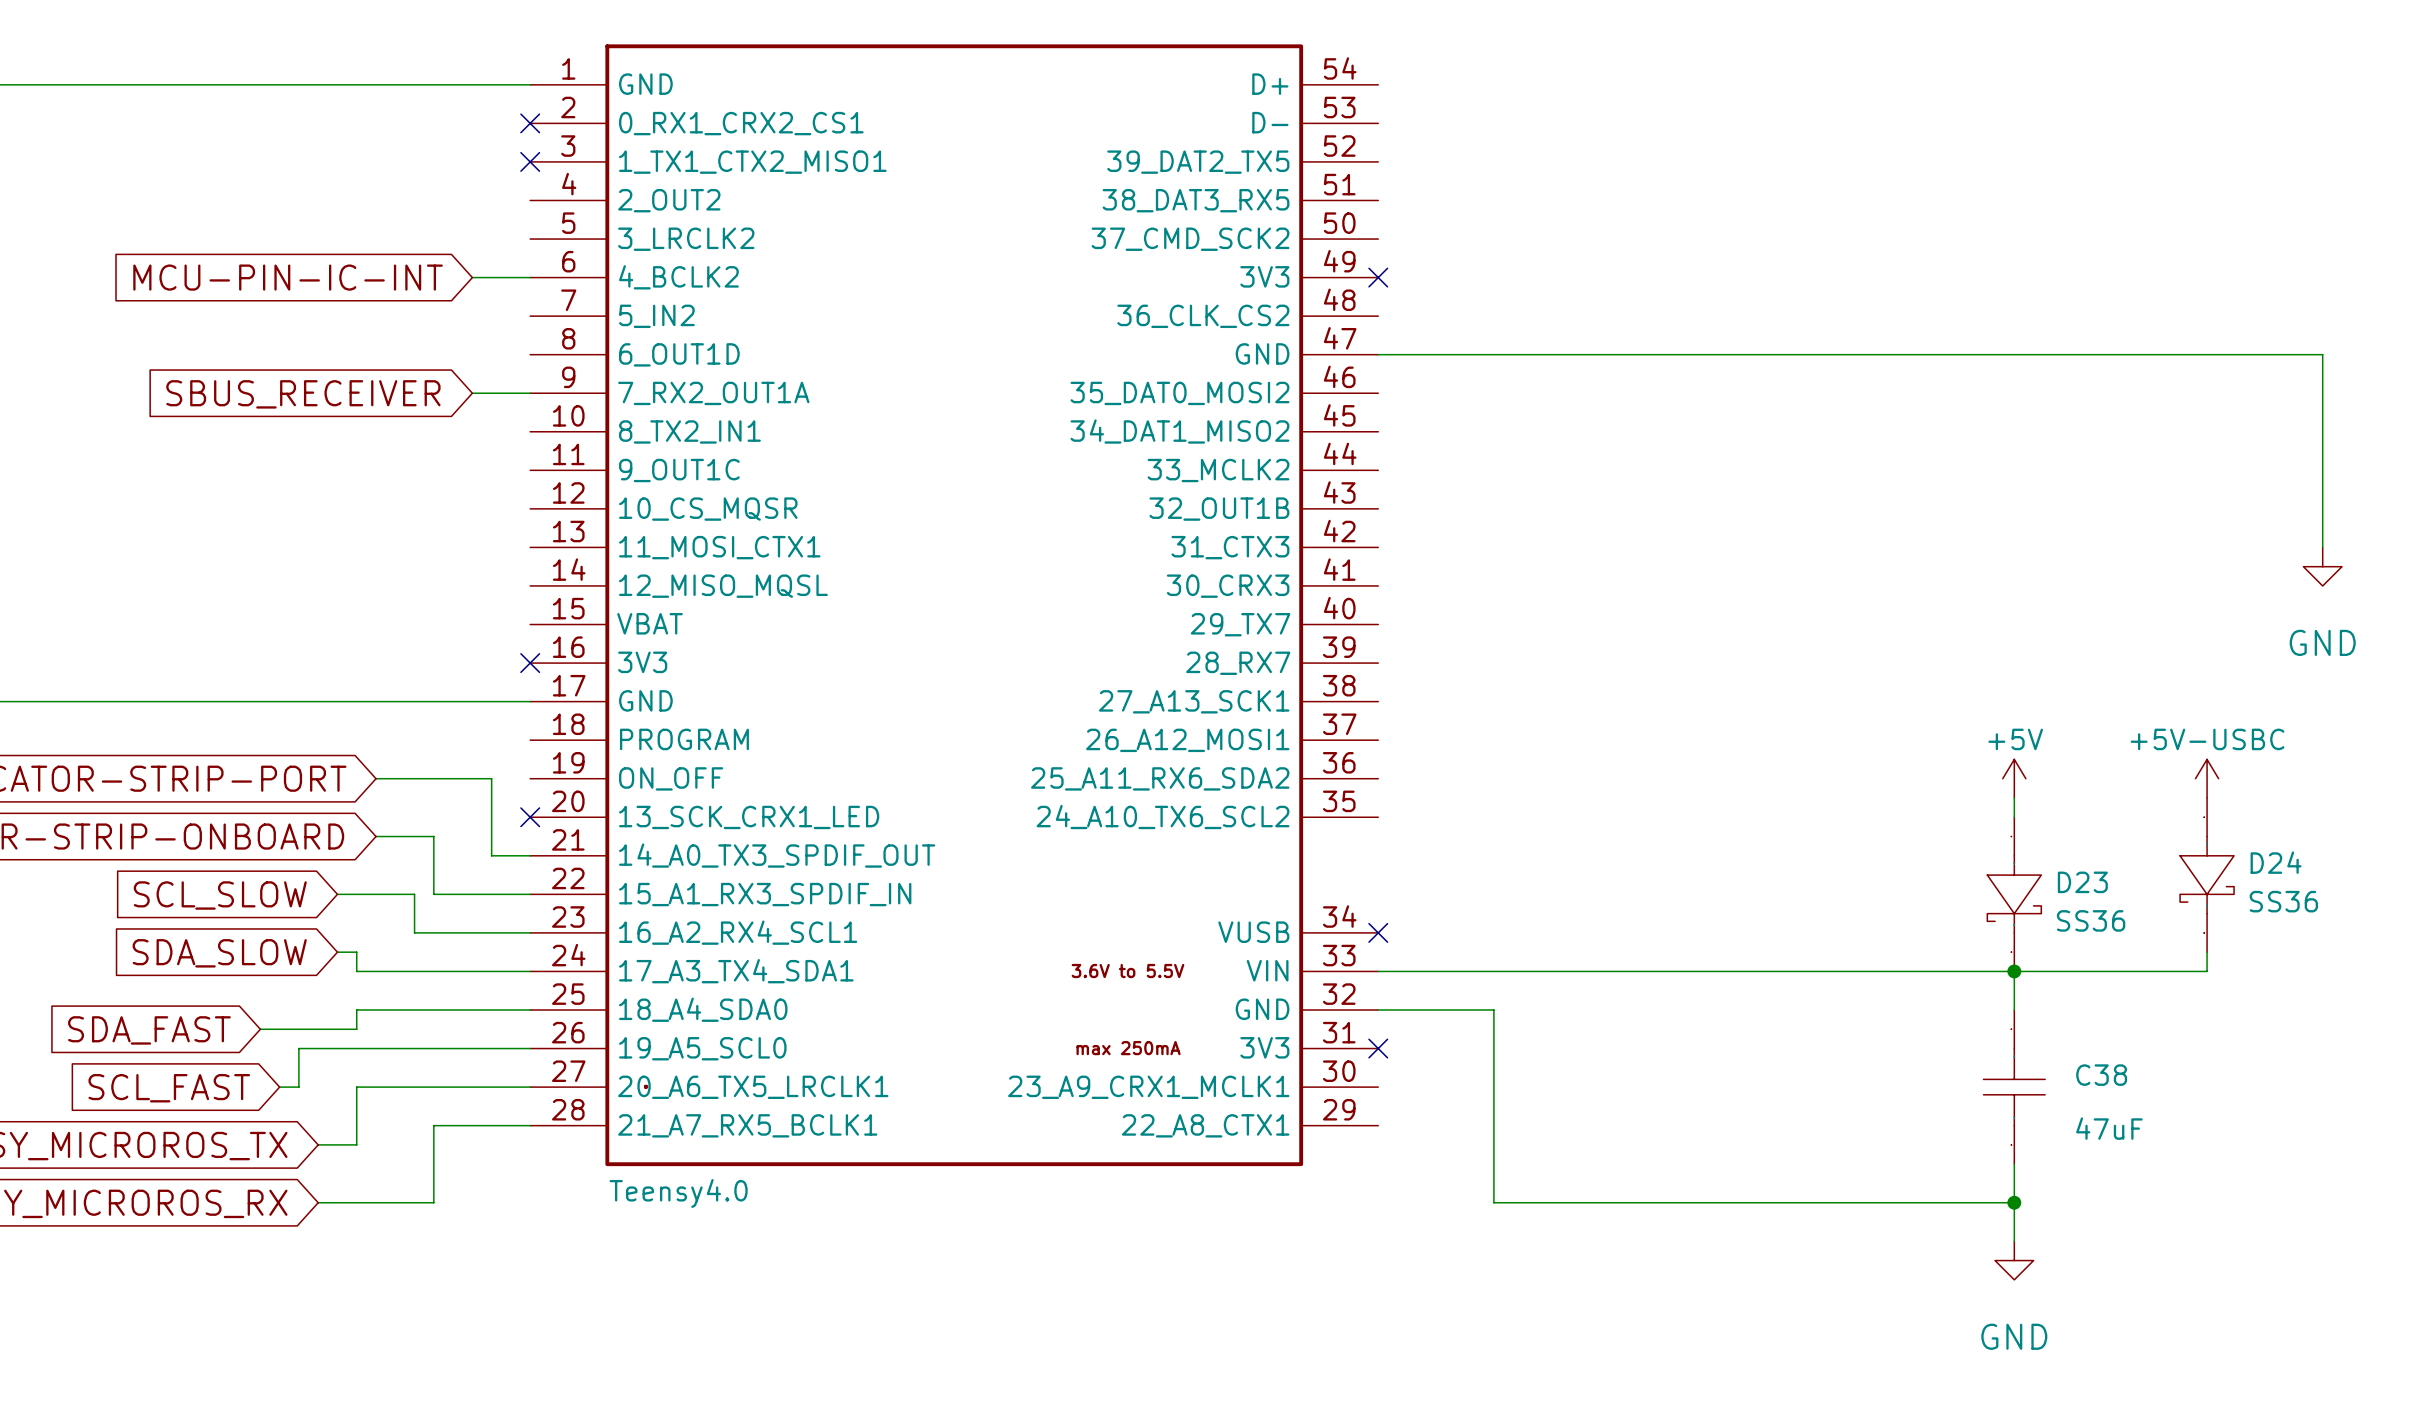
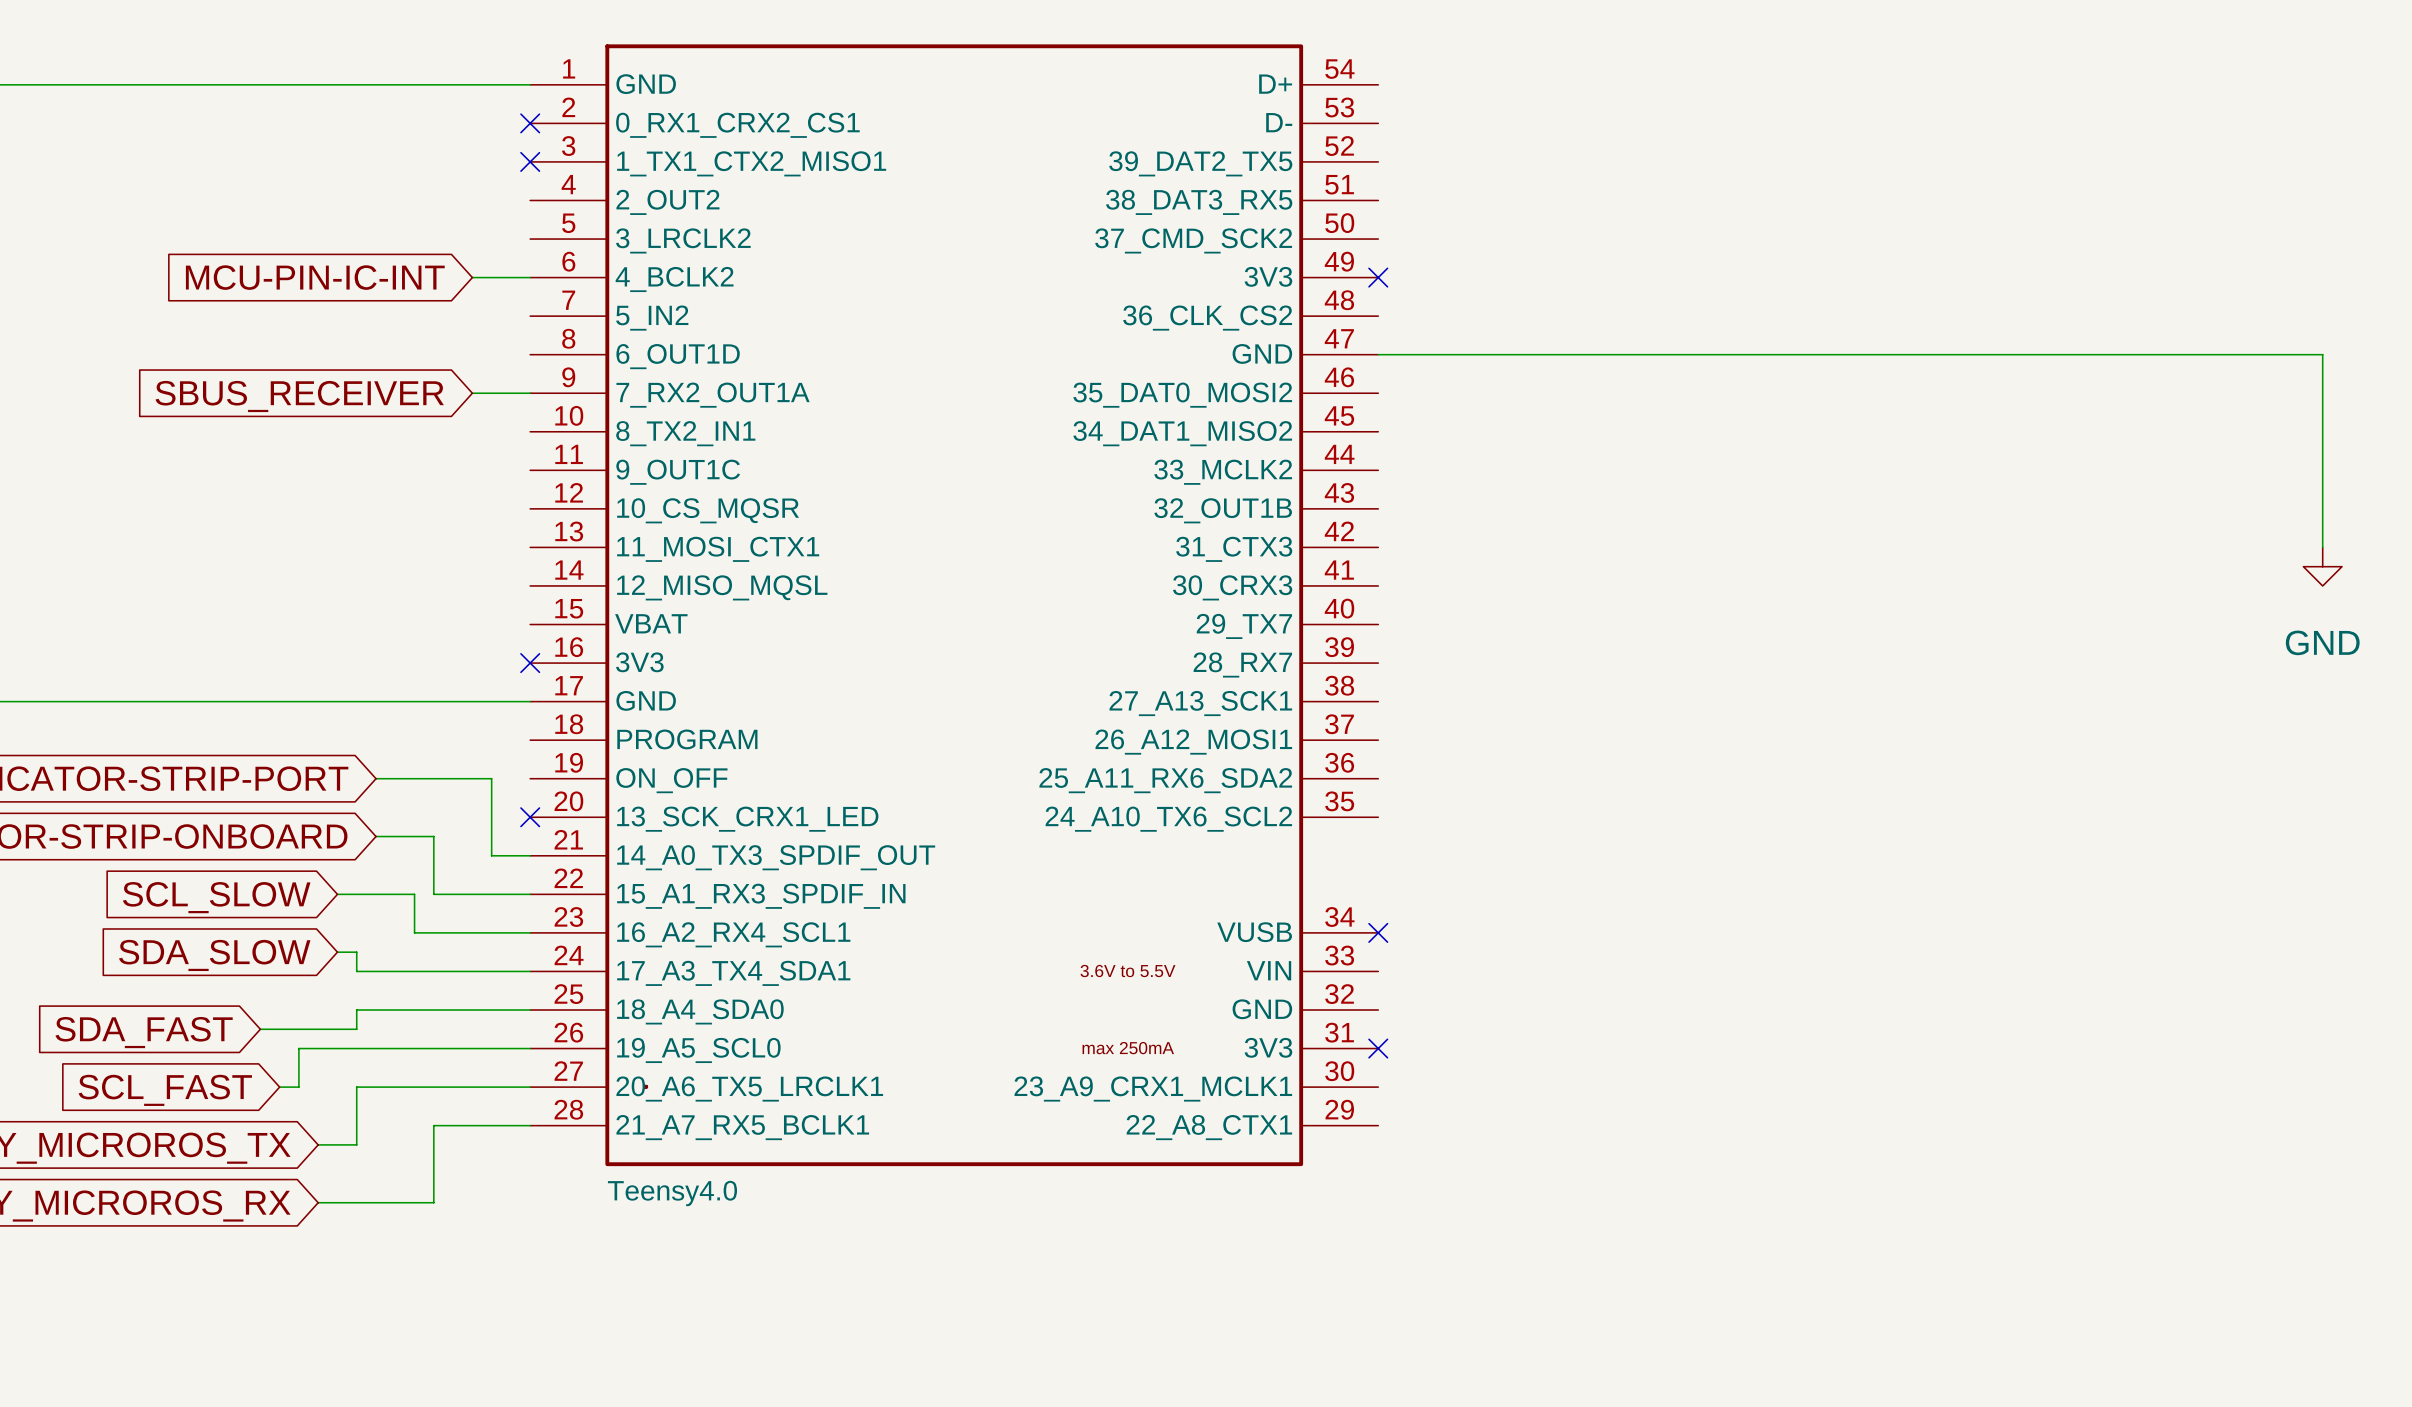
power symbol: +5V (2014, 778) -> none
power symbol: +5V-USBC (2207, 778) -> none
wire: (2014, 797) (2014, 817) -> none
D24: SS36 (2207, 875) -> none
D23: SS36 (2014, 894) -> none
wire: (2207, 952) (2207, 971) (1378, 971) -> none
wire: (2014, 971) (2014, 1010) -> none
junction: (2014, 971) -> none
wire: (1378, 1010) (1493, 1010) (1493, 1202) (2014, 1202) -> none
C38: 47uF (2014, 1087) -> none
wire: (2014, 1164) (2014, 1241) -> none
junction: (2014, 1202) -> none
power symbol: GND (2014, 1260) -> none

